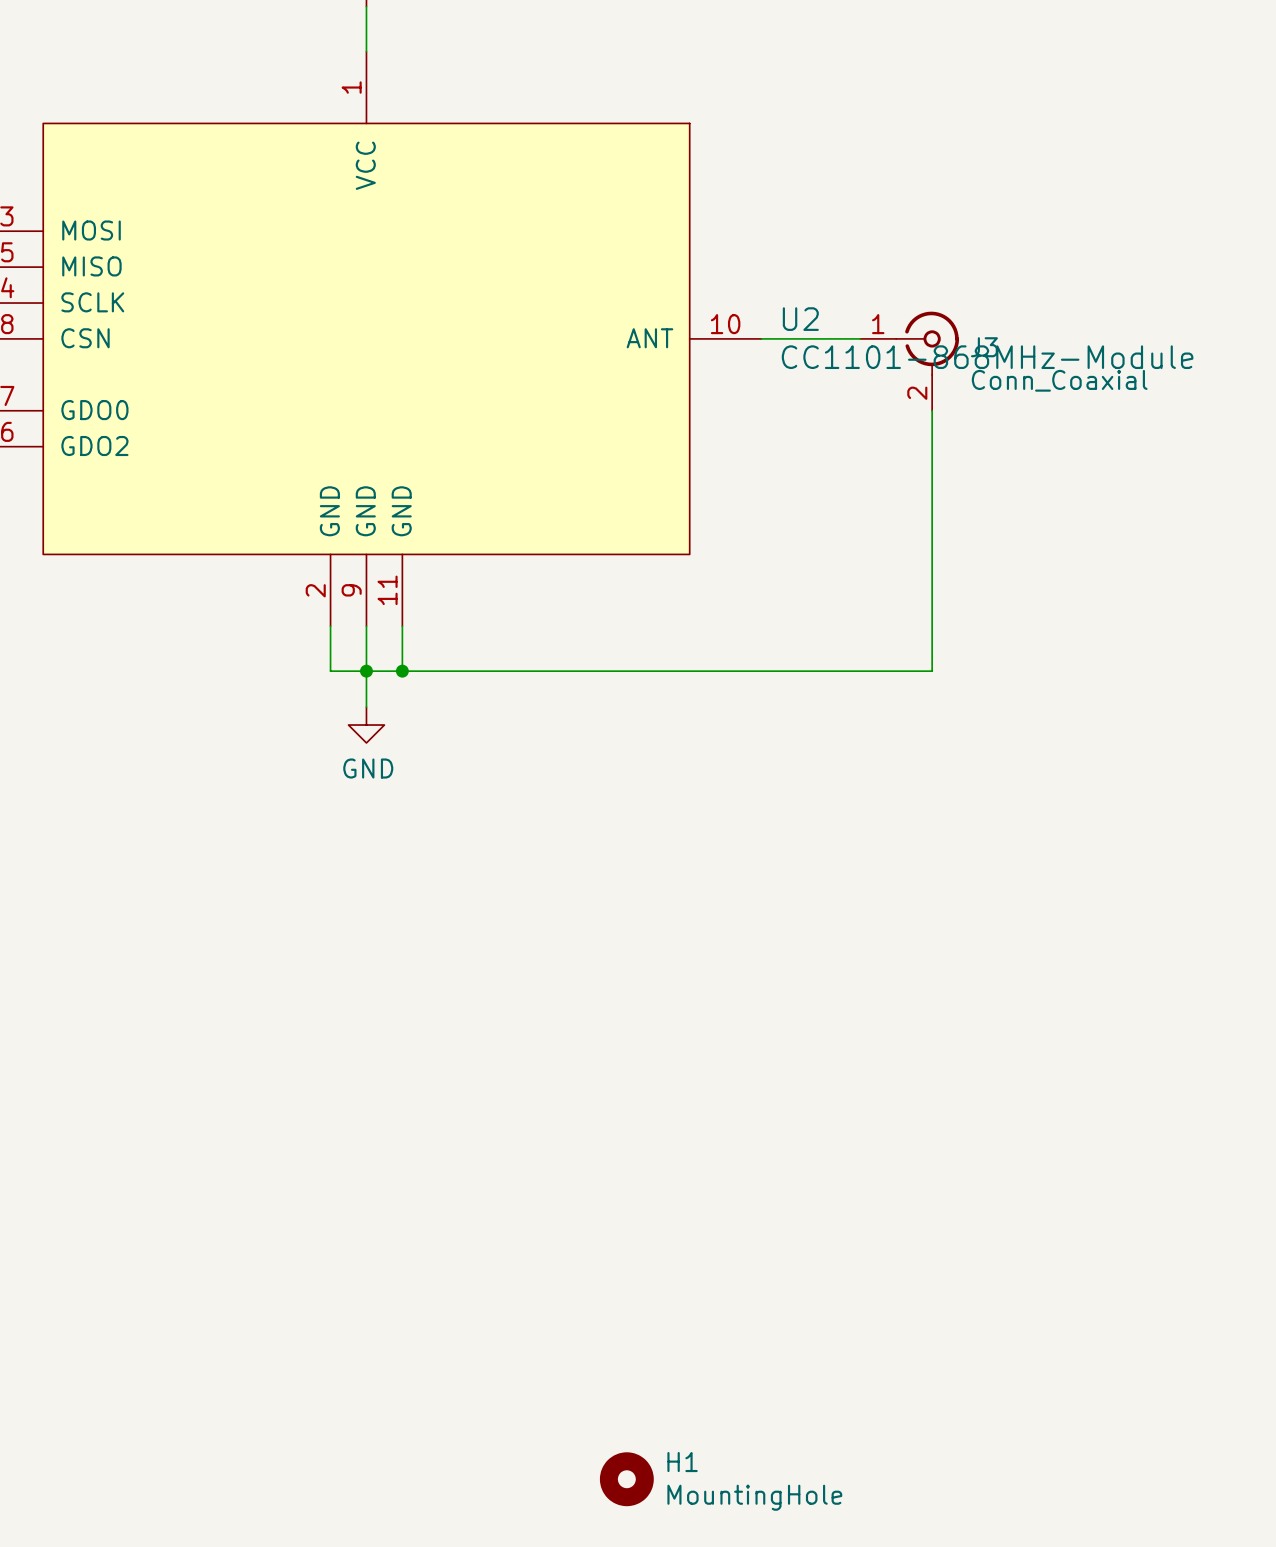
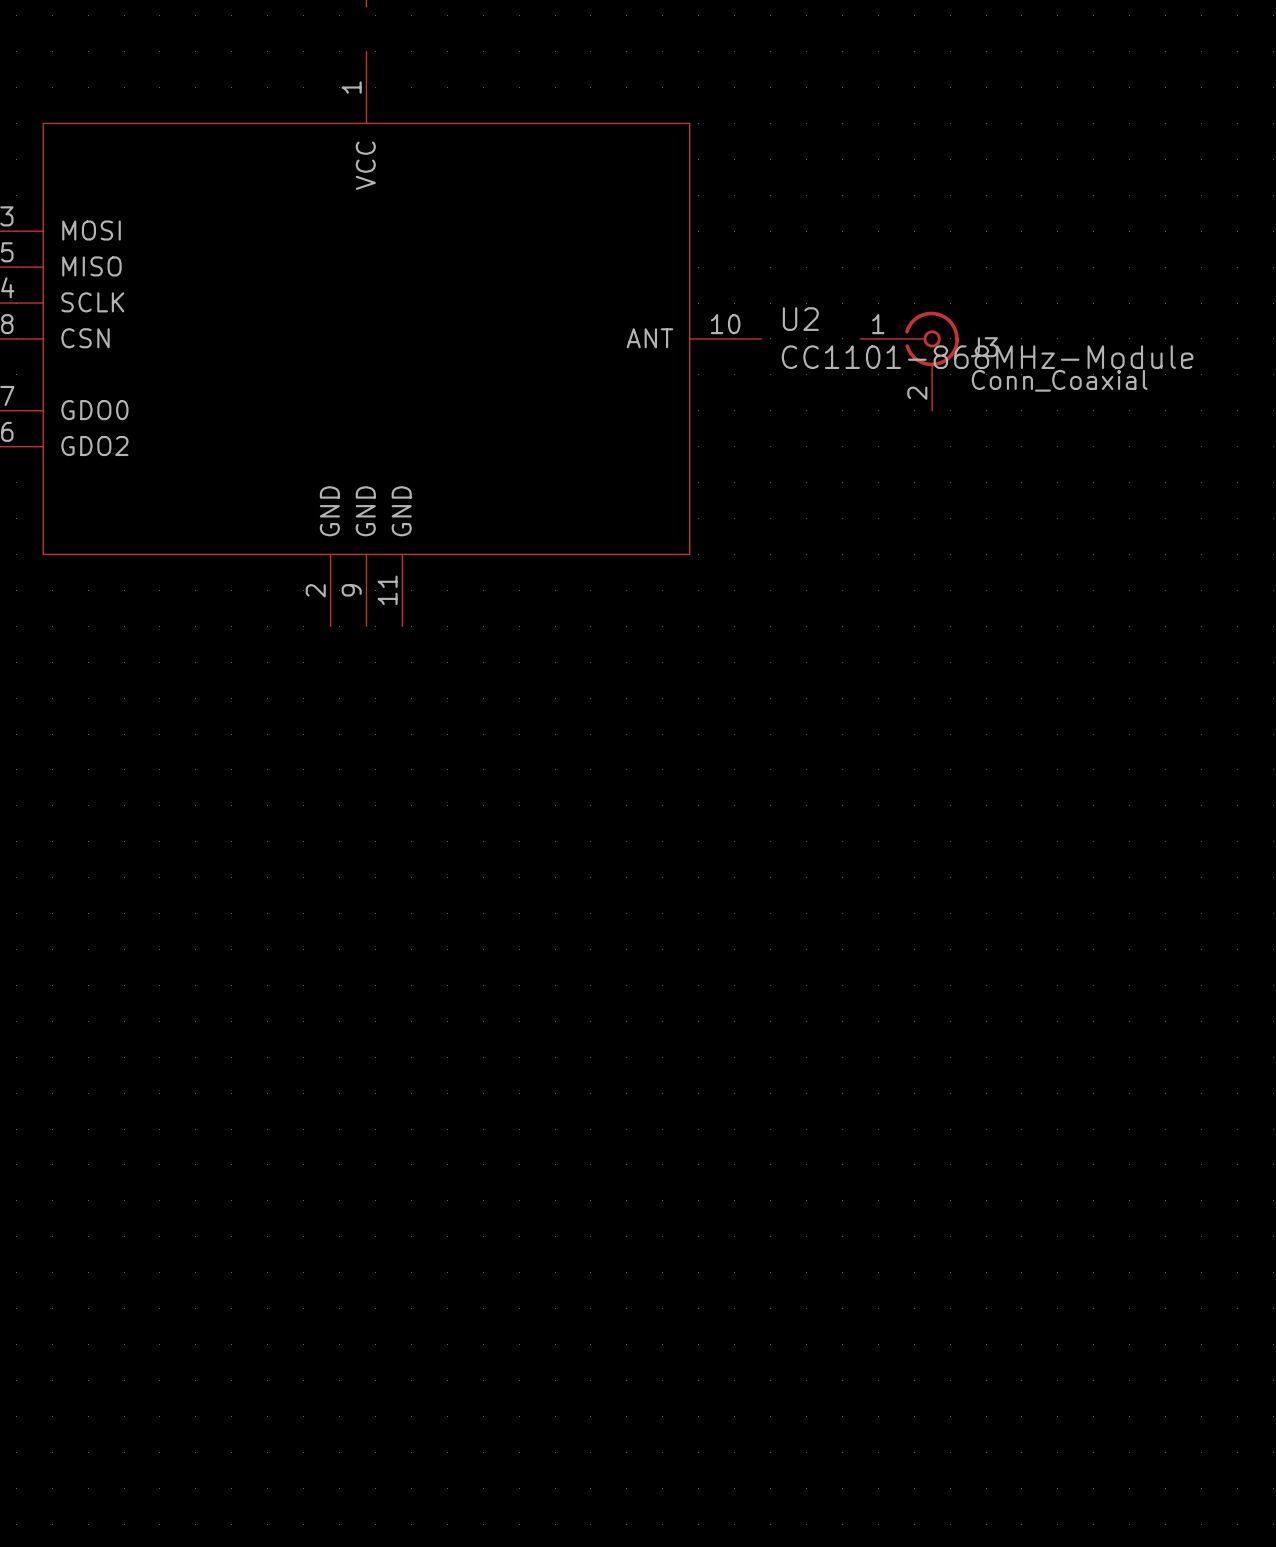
wire: (366, 6) (366, 51) -> none
wire: (761, 338) (860, 338) -> none
wire: (932, 410) (932, 671) (330, 671) (330, 626) -> none
wire: (366, 626) (366, 707) -> none
wire: (402, 626) (402, 671) -> none
junction: (366, 671) -> none
junction: (402, 671) -> none
power symbol: GND (366, 725) -> none
H1: MountingHole (626, 1479) -> none

